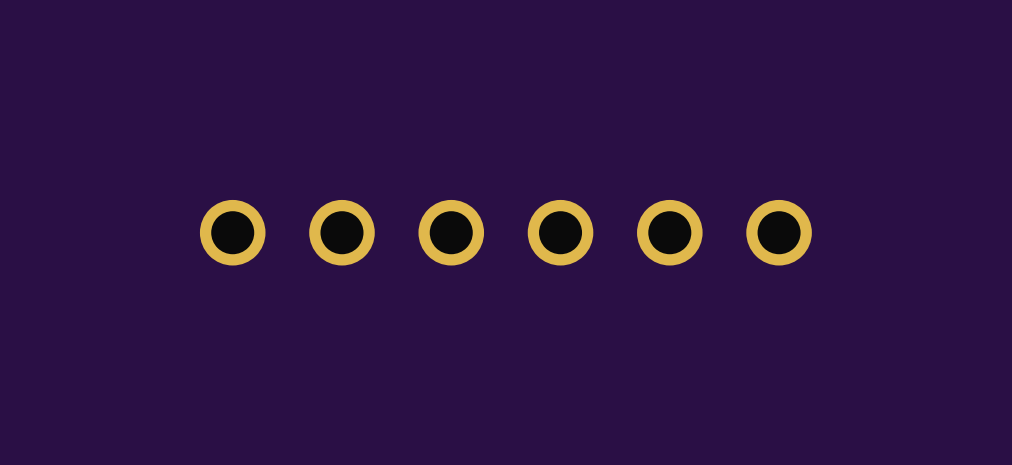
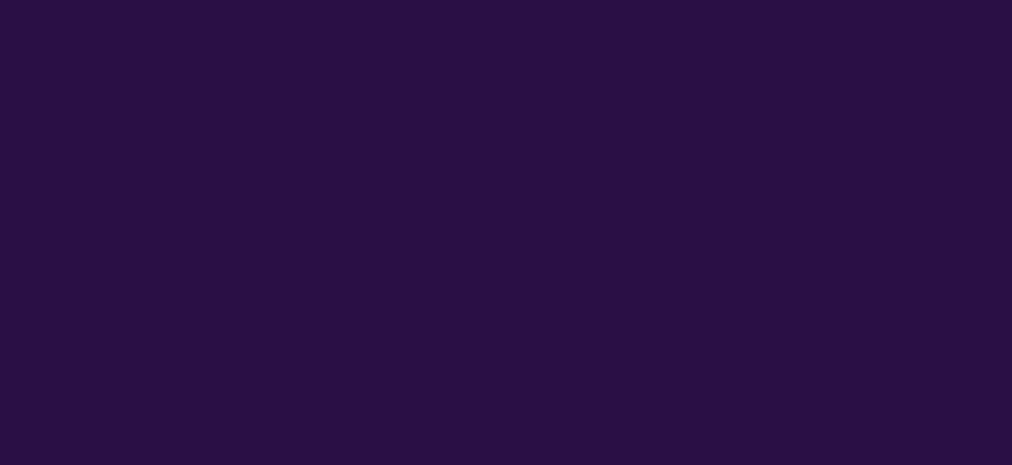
part: (505, 232) -> none

